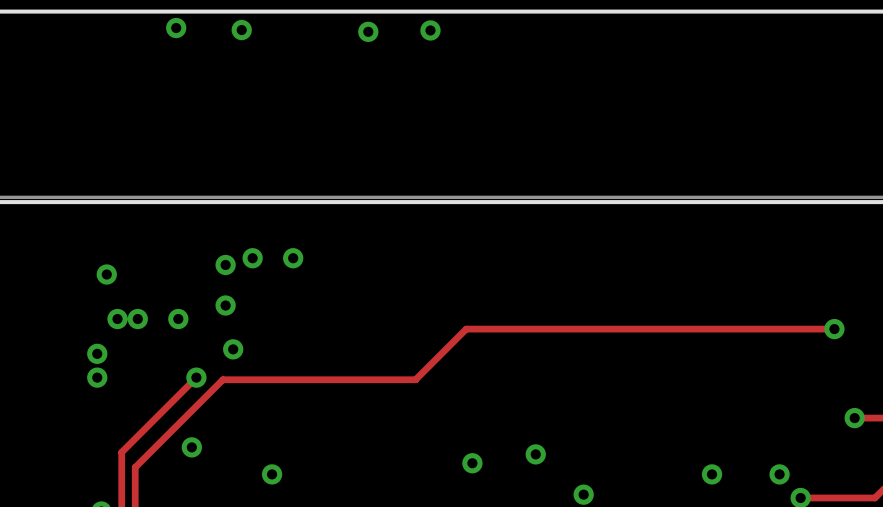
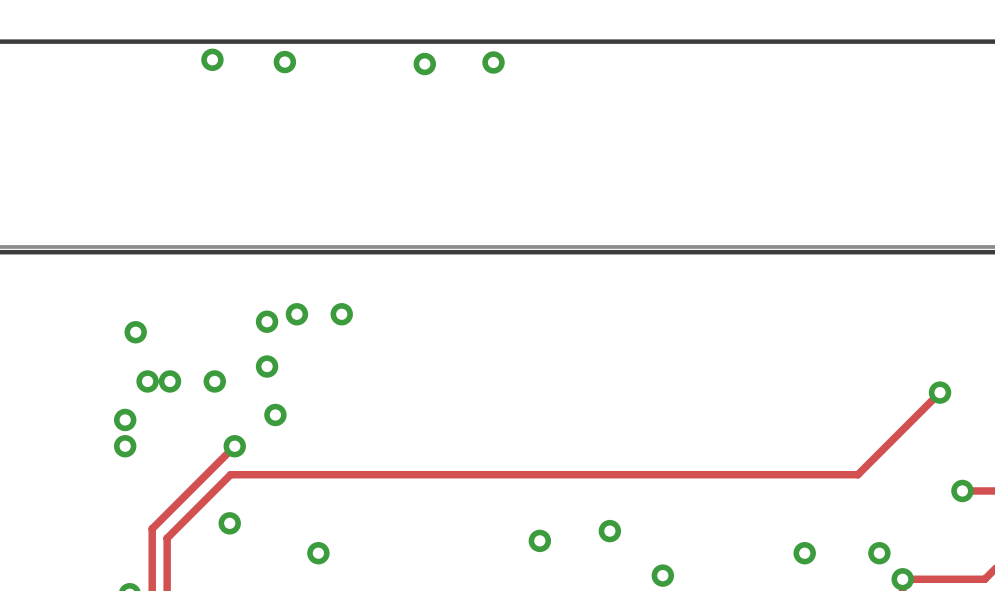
track: (834, 329) (466, 329) (415, 379) (222, 379) (135, 467) -> (940, 392) (857, 474) (230, 474) (167, 538) (167, 545)

